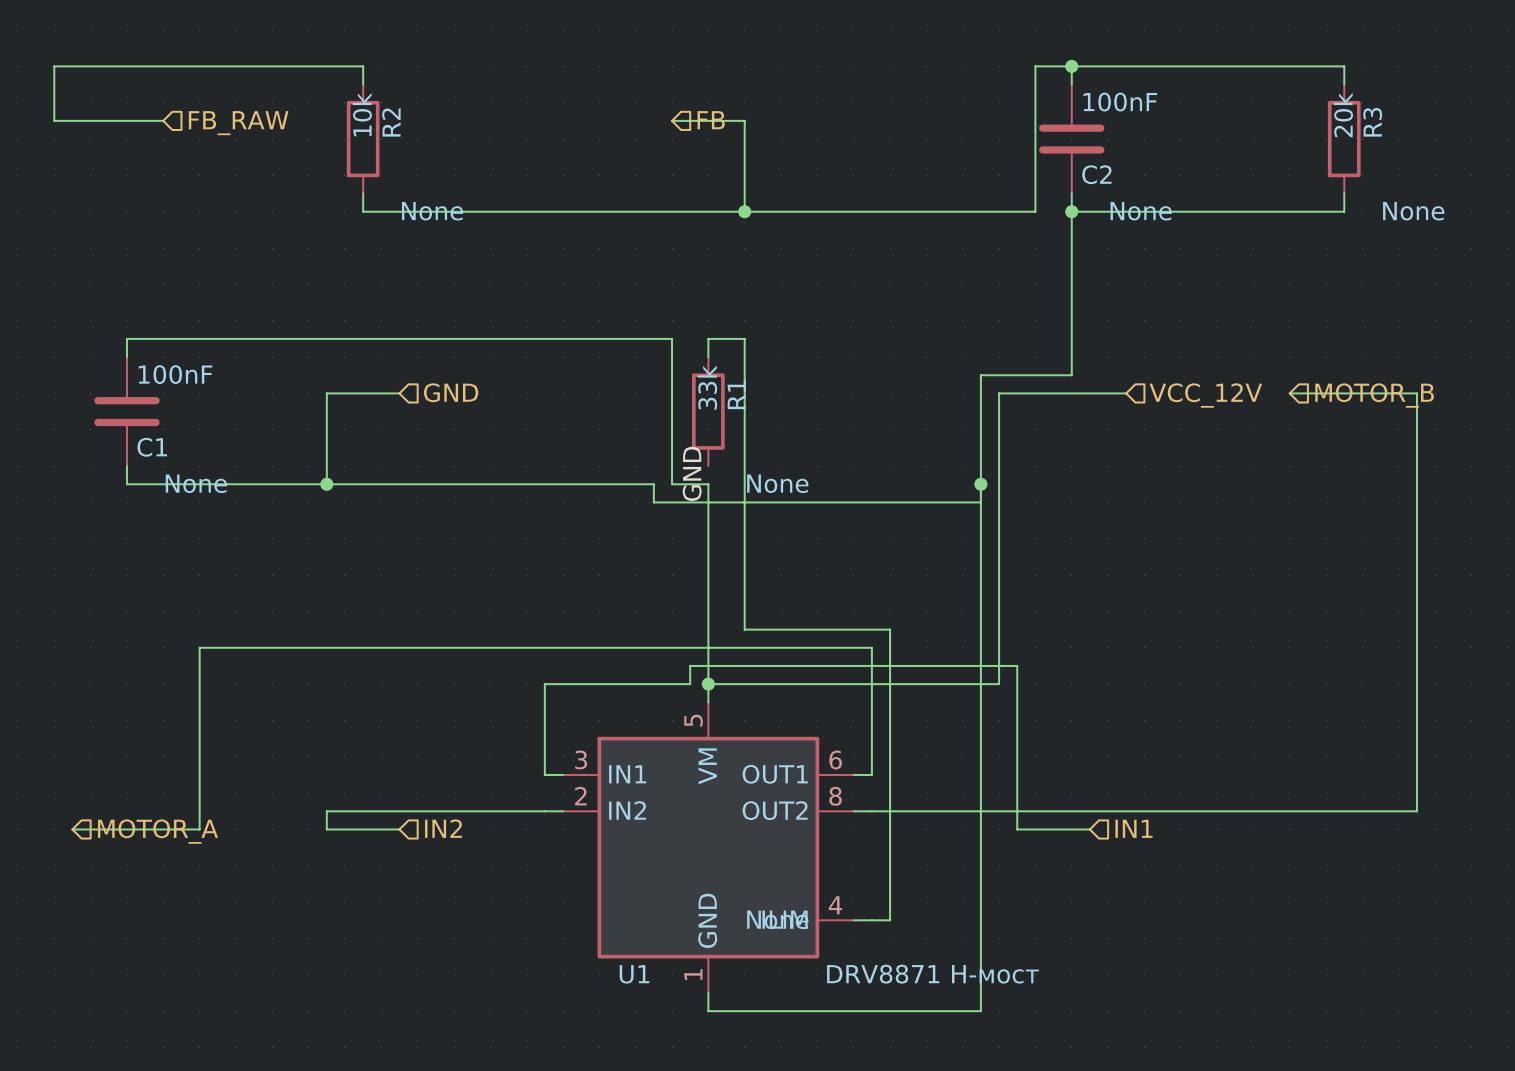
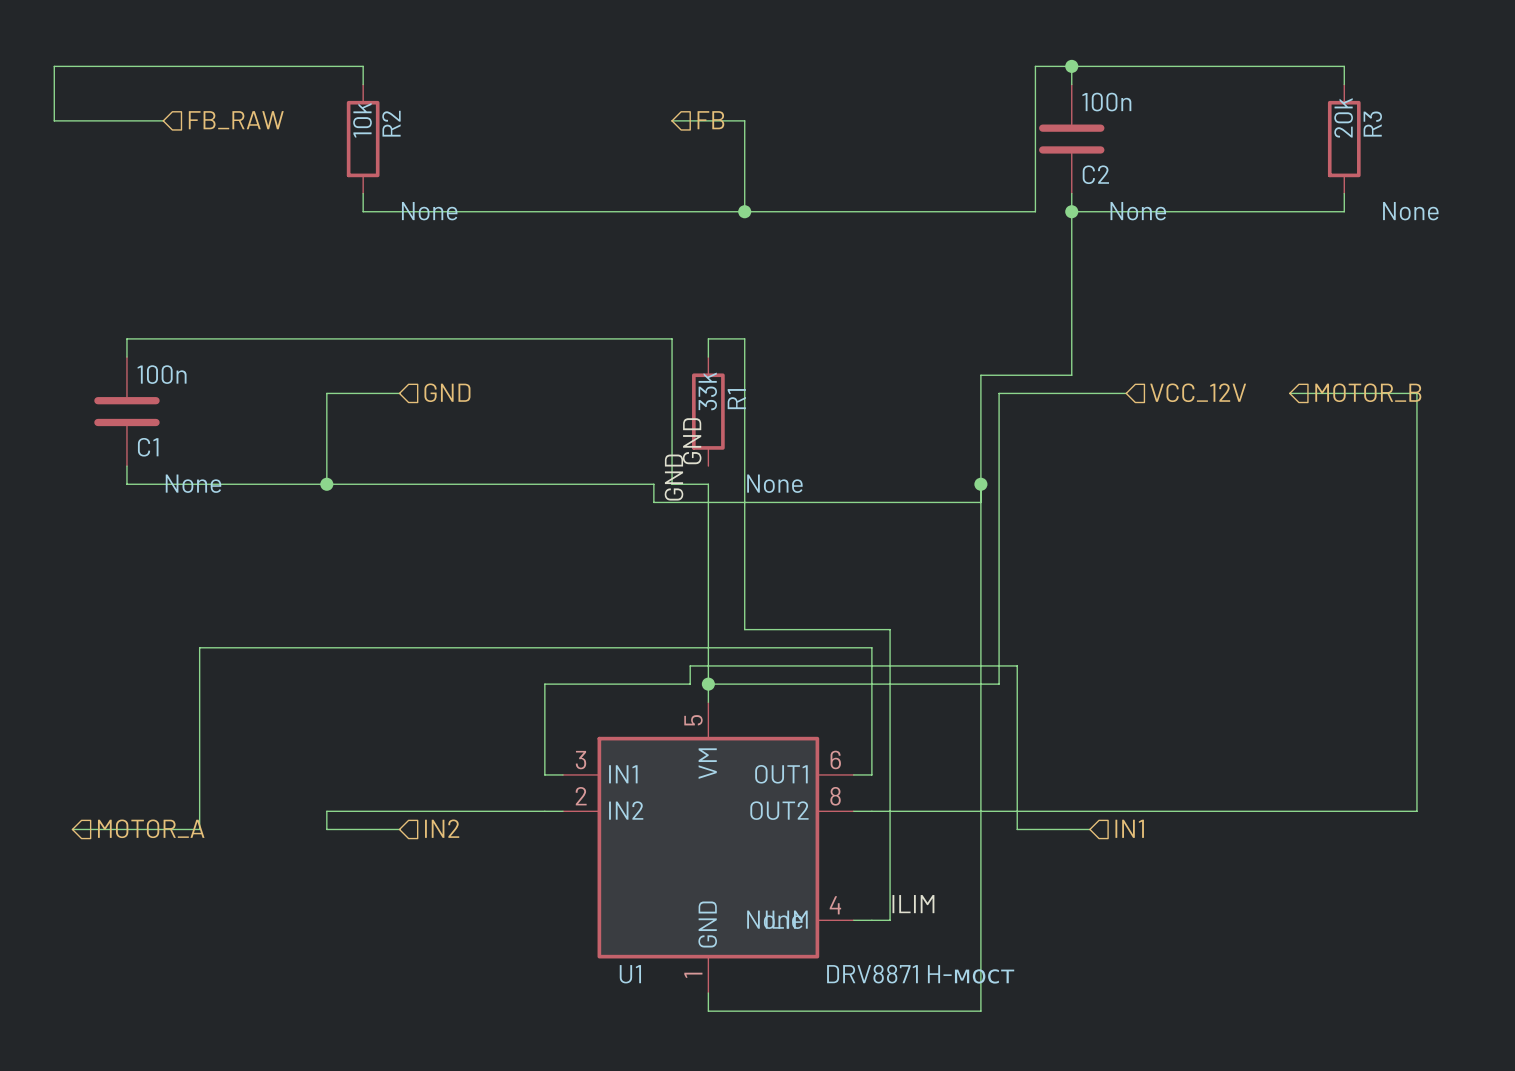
C2 value: 100nF (1120, 102) -> 100n (1106, 102)
C1 value: 100nF (175, 374) -> 100n (162, 374)
label: none -> GND (692, 441)
label: none -> GND (673, 477)
label: GND (692, 473) -> none
label: none -> ILIM (913, 904)

